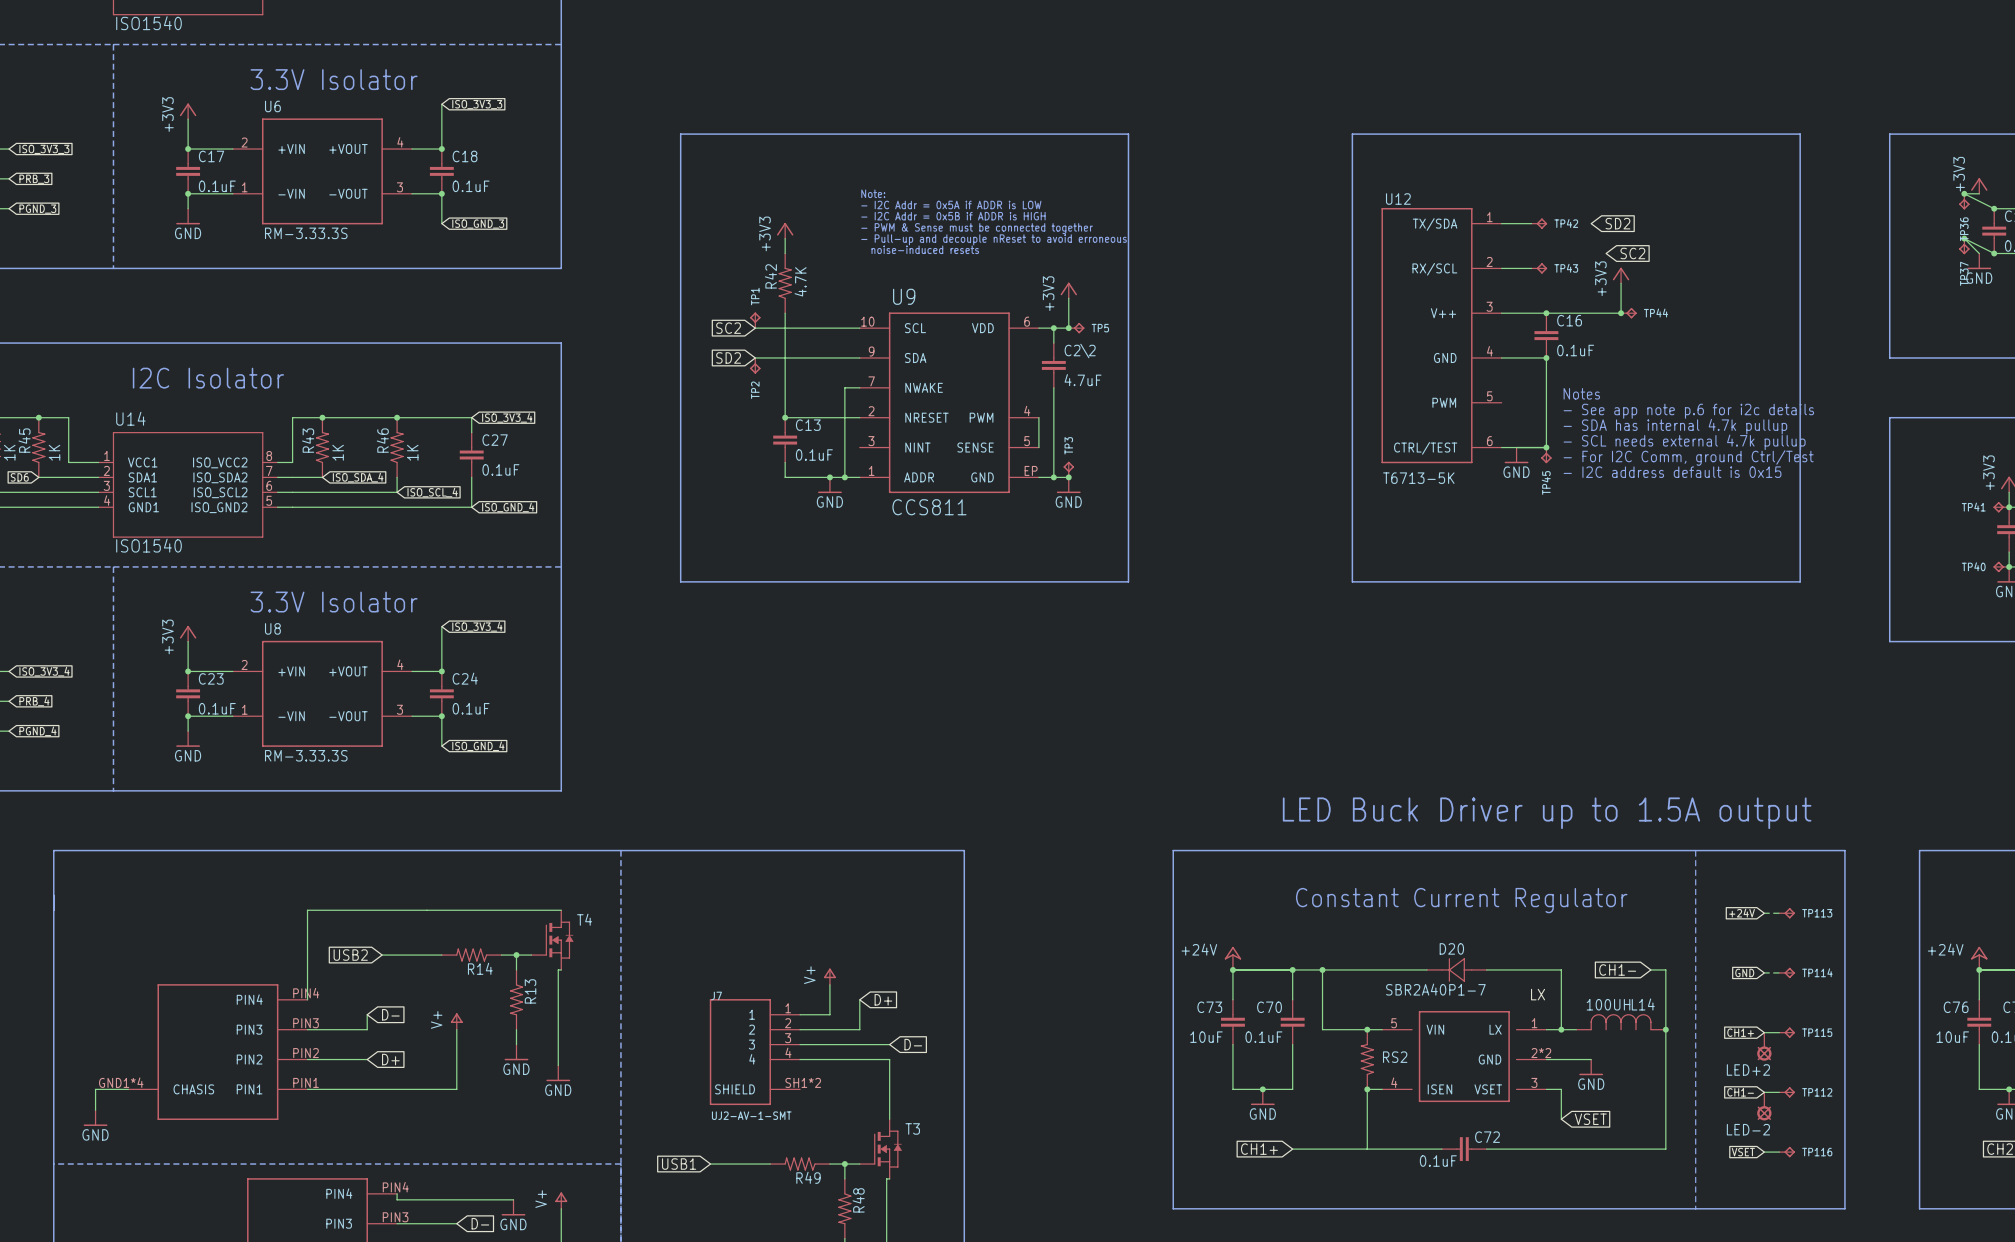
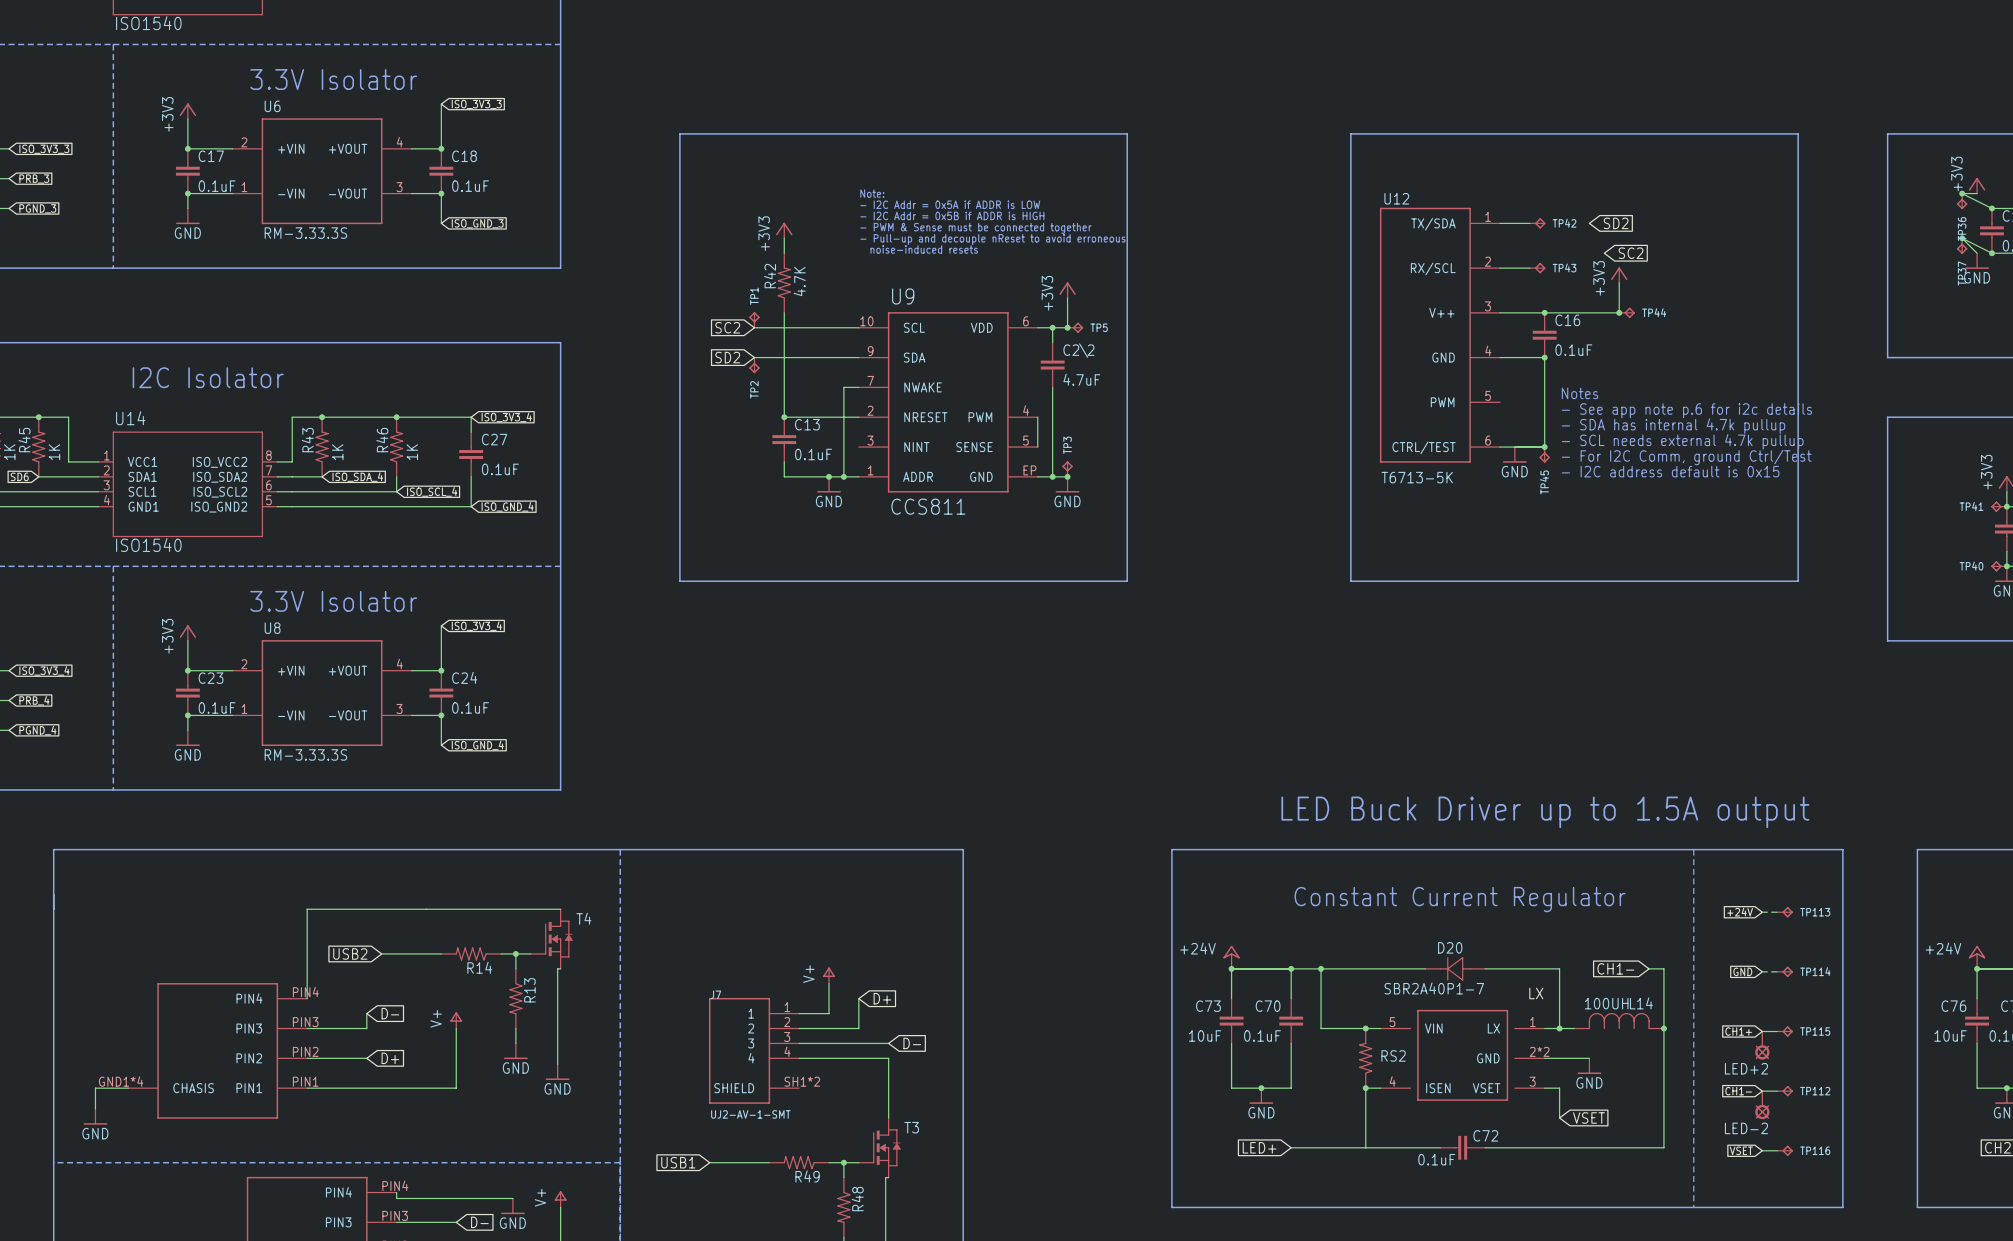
global label: CH1+ (1259, 1149) -> LED+ (1259, 1147)

